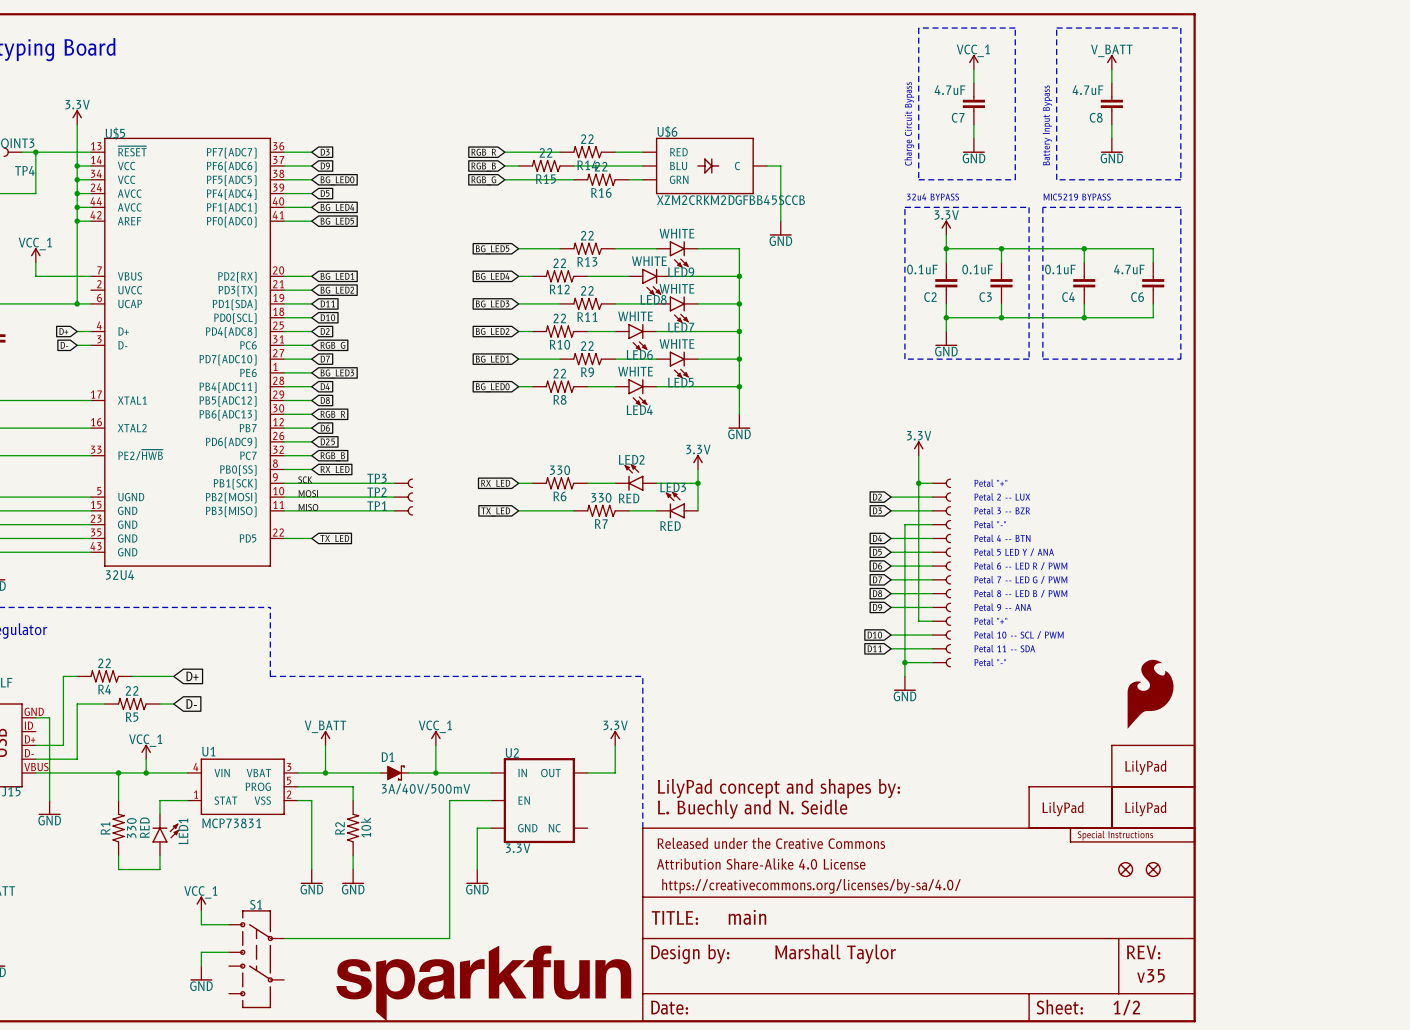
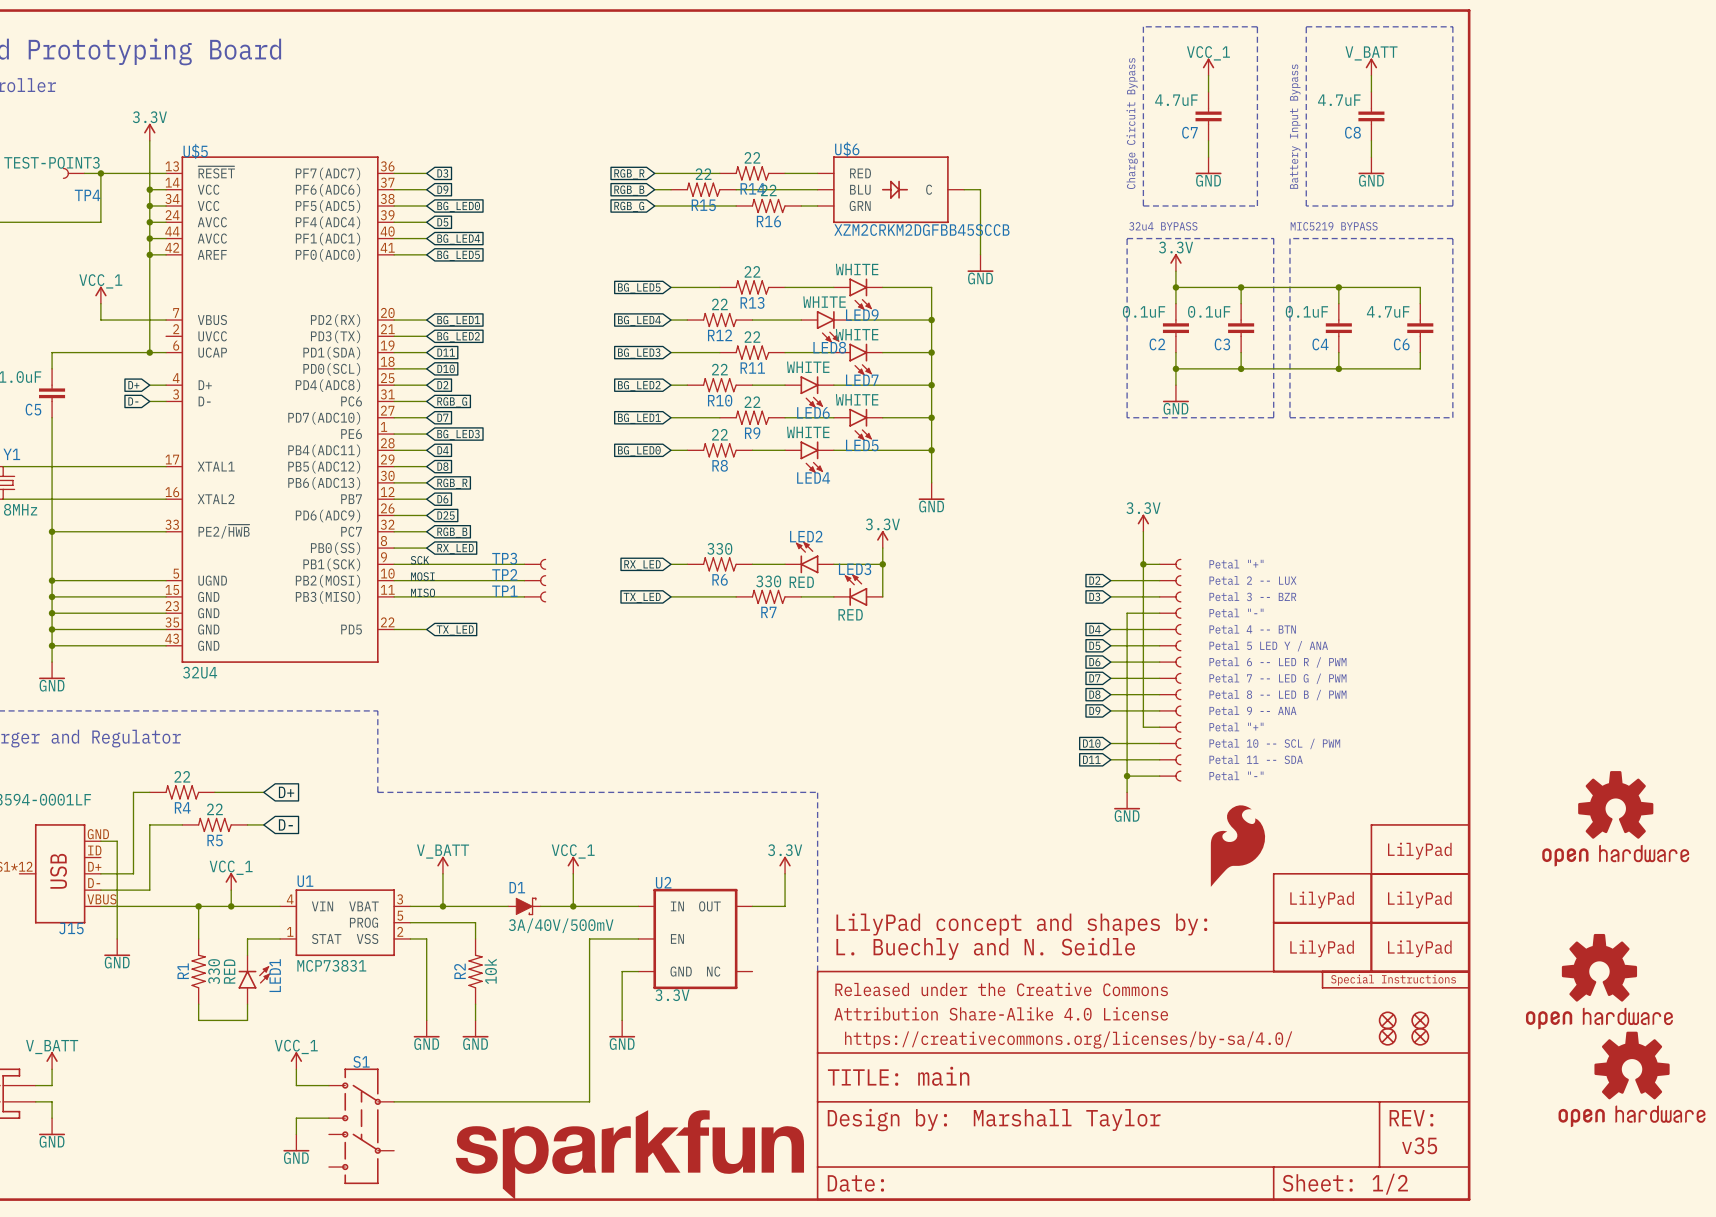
part: (1150, 694) -> none
part: none -> (1615, 818)
part: none -> (1237, 846)
part: none -> (1420, 849)
part: none -> (1322, 898)
part: none -> (1599, 981)
part: none -> (1387, 1036)
part: none -> (1420, 1036)
part: none -> (1632, 1079)

